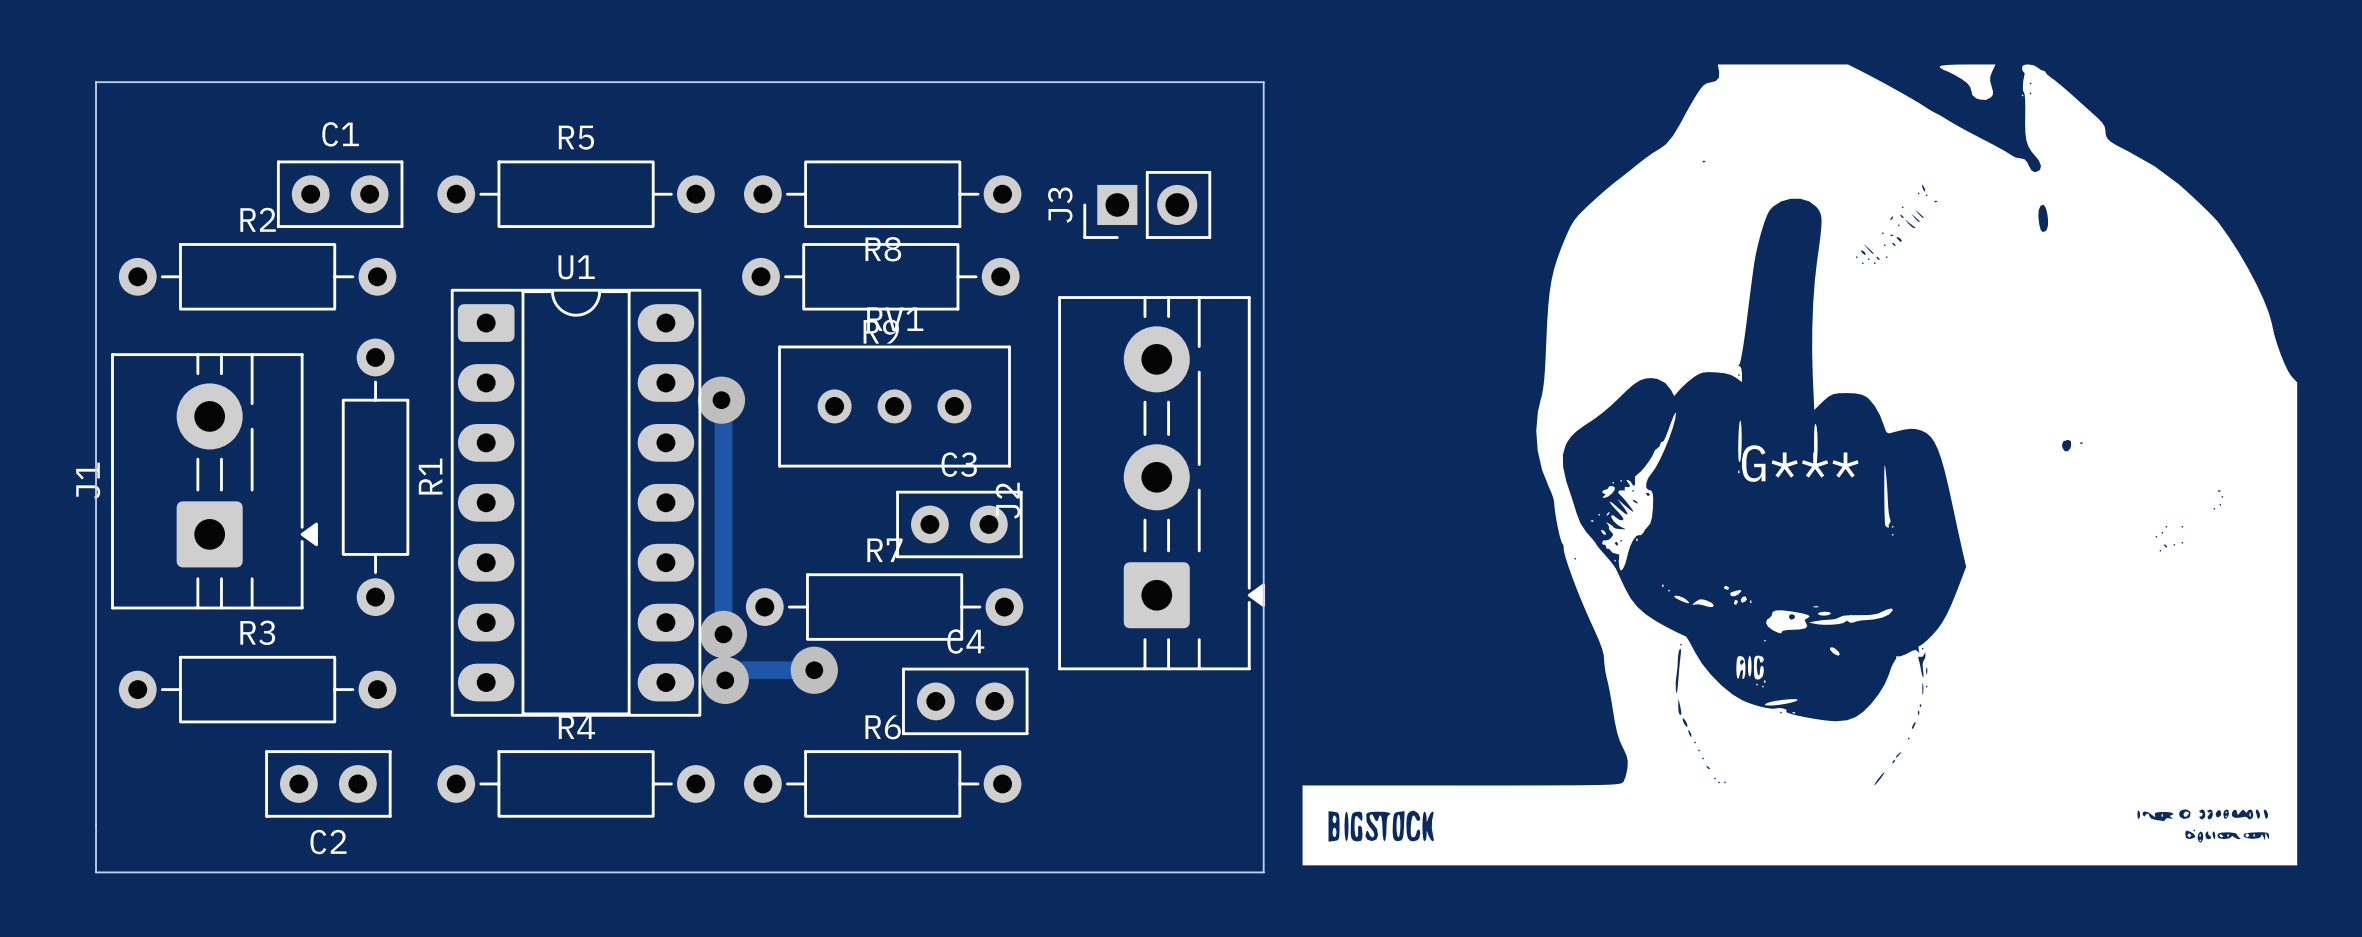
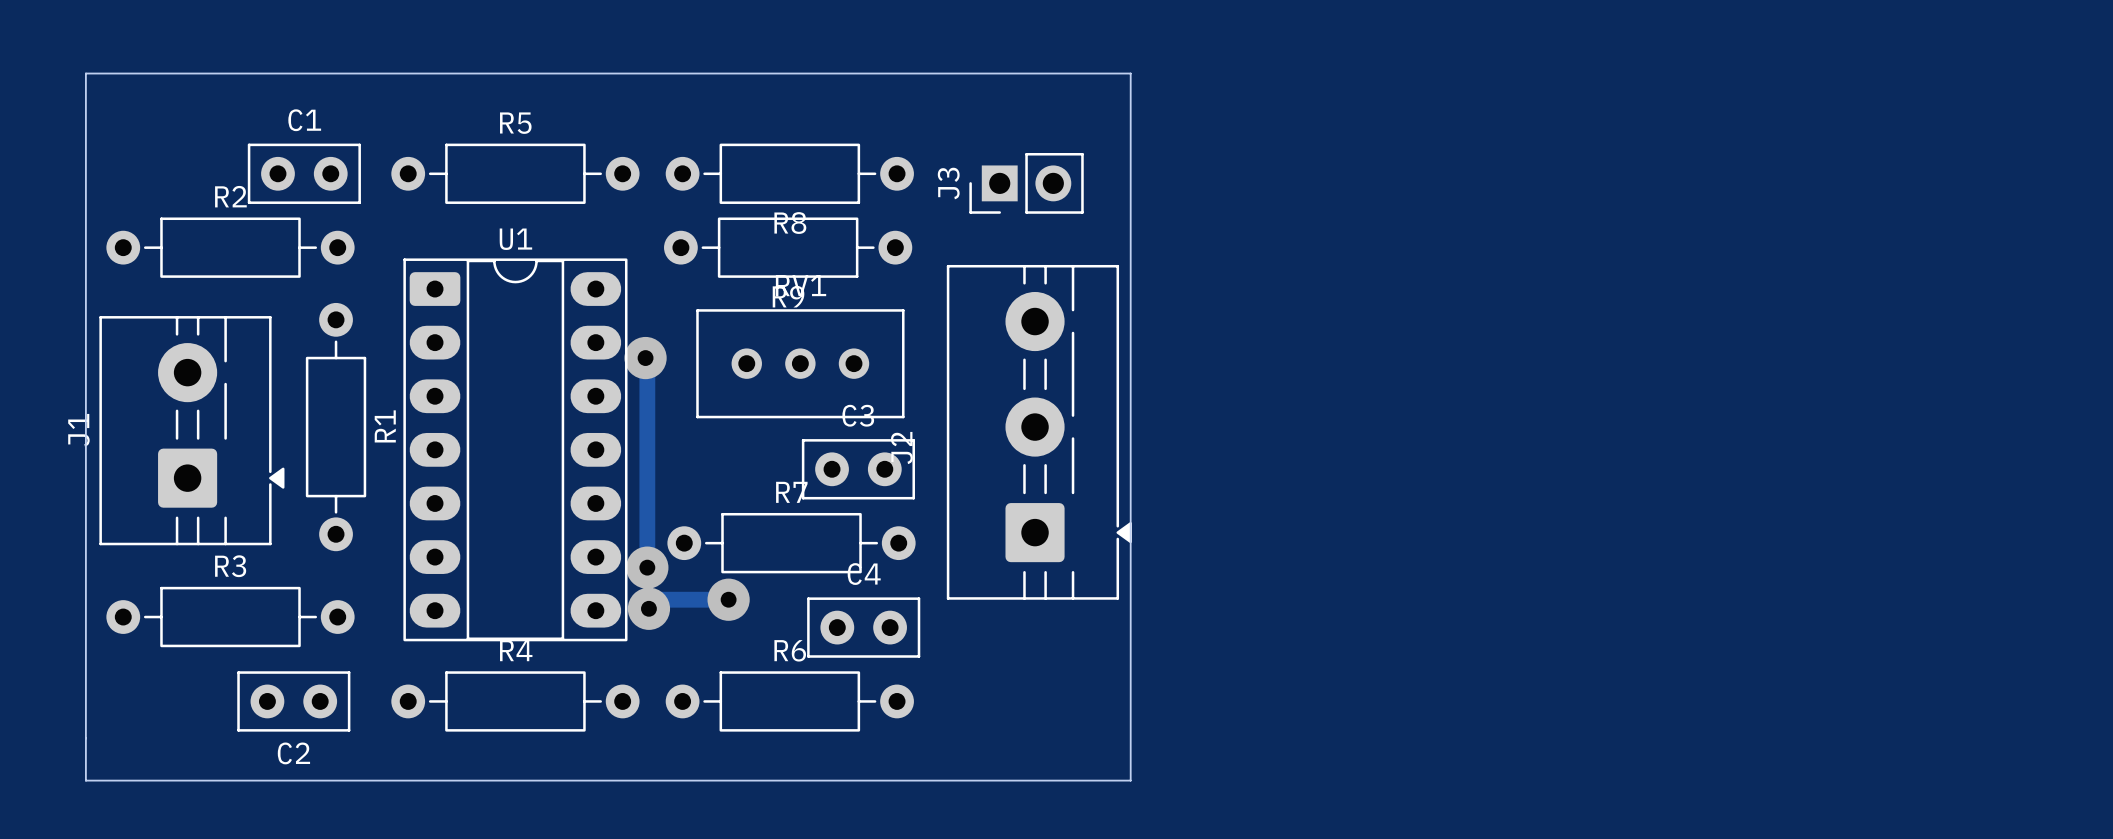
G***: (1799, 464) -> none

